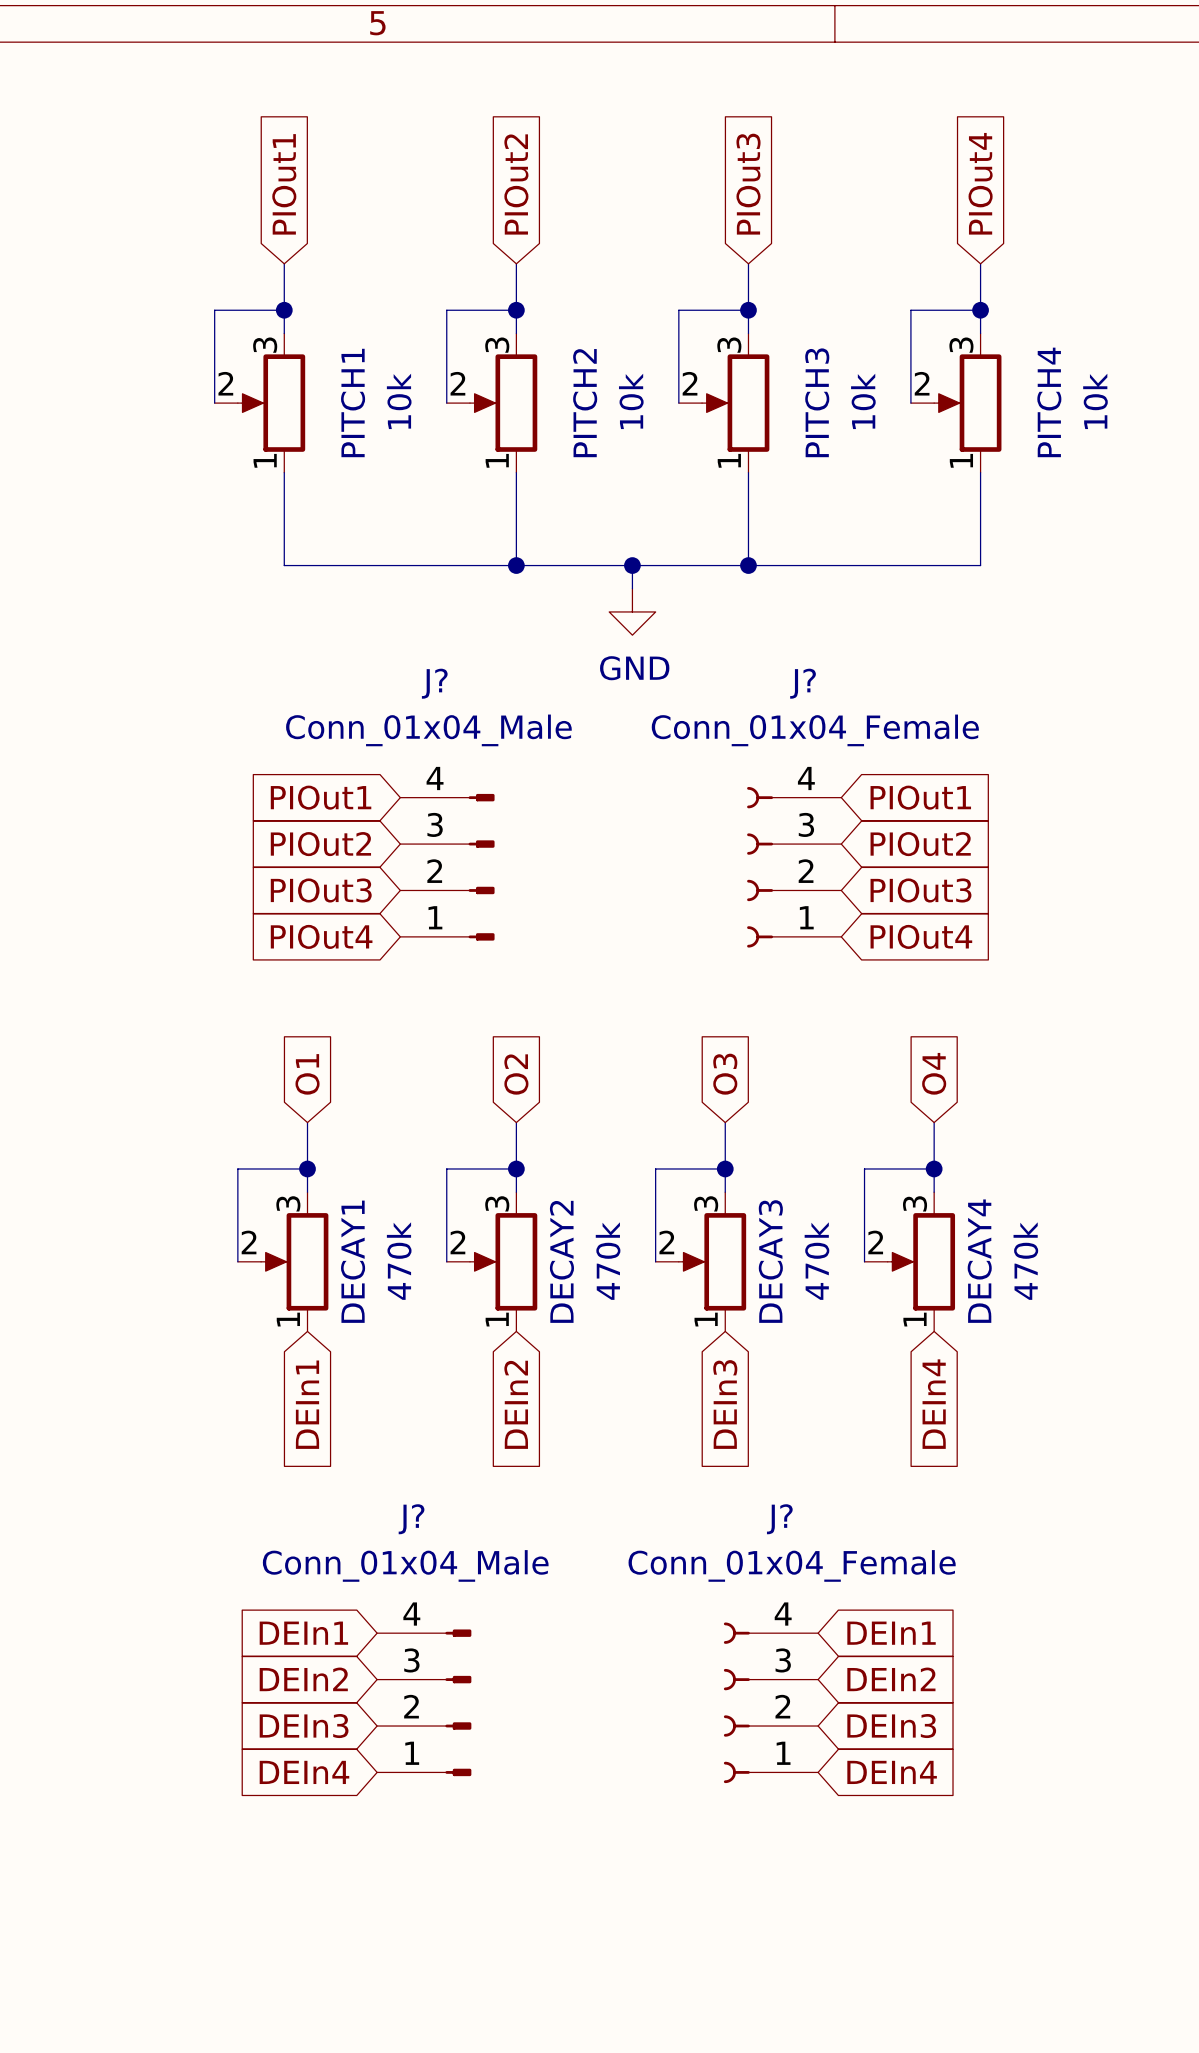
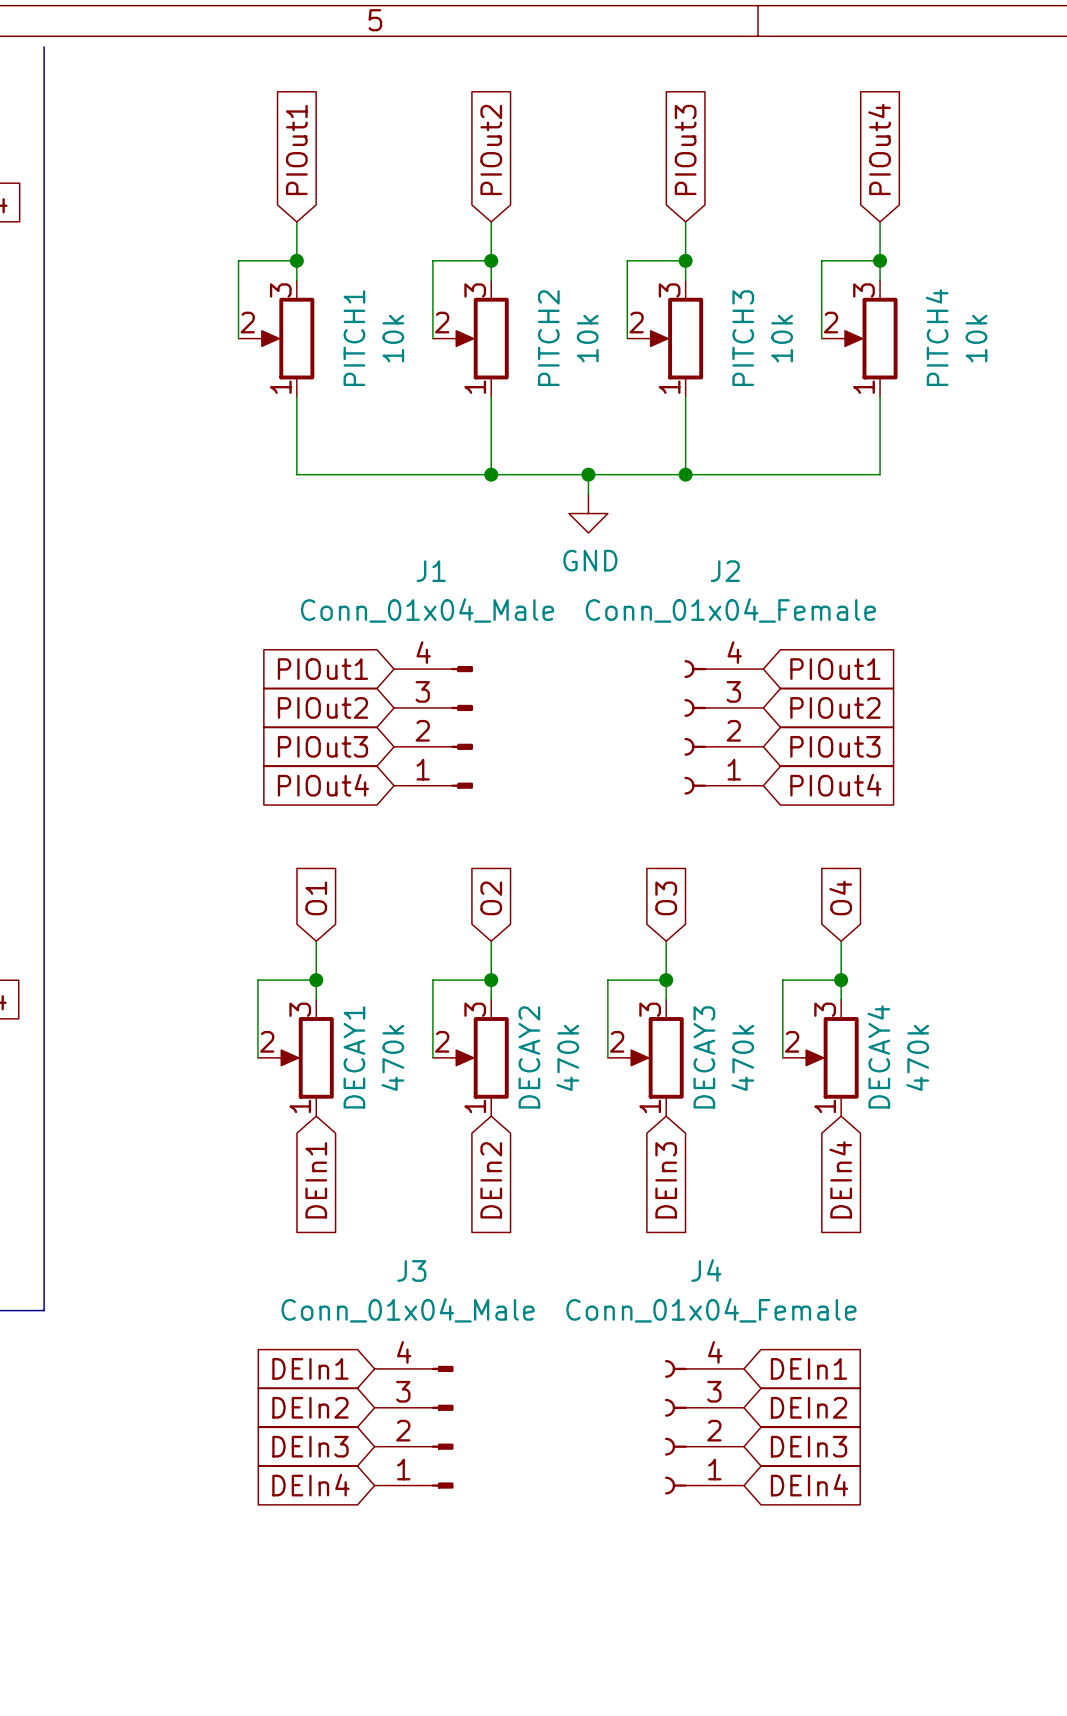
J? name: J? (434, 683) -> J1 (431, 571)
J? name: J? (803, 683) -> J2 (725, 571)
J? name: J? (411, 1519) -> J3 (411, 1270)
J? name: J? (779, 1519) -> J4 (706, 1270)

